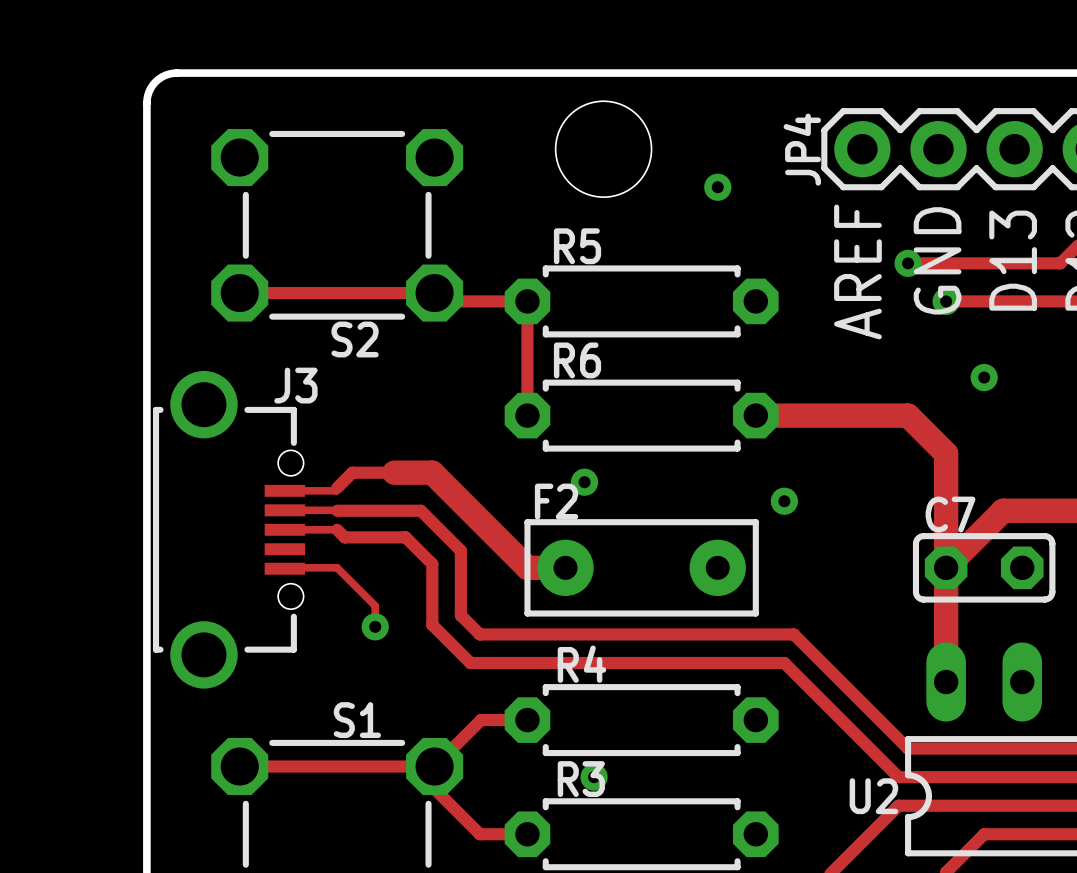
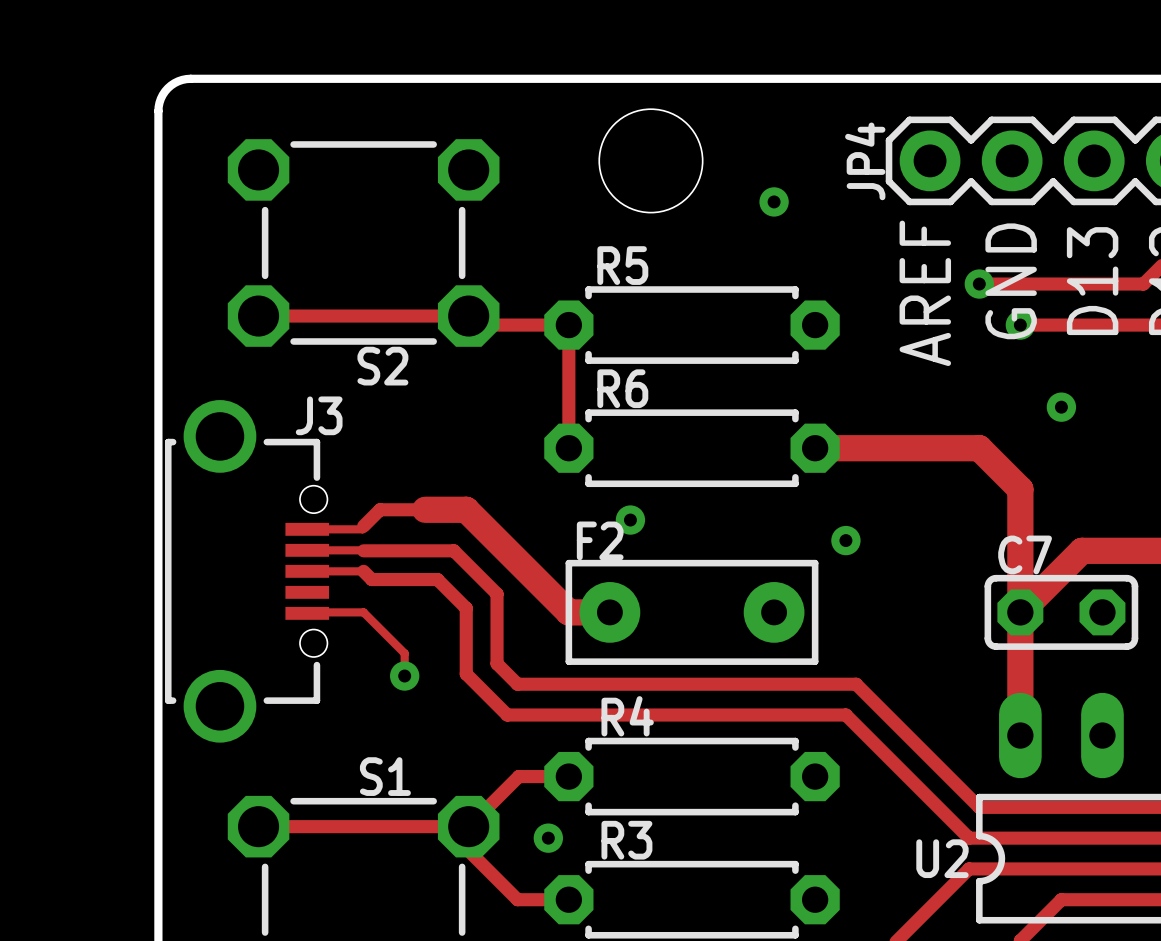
via position: (594, 777) -> (548, 838)

